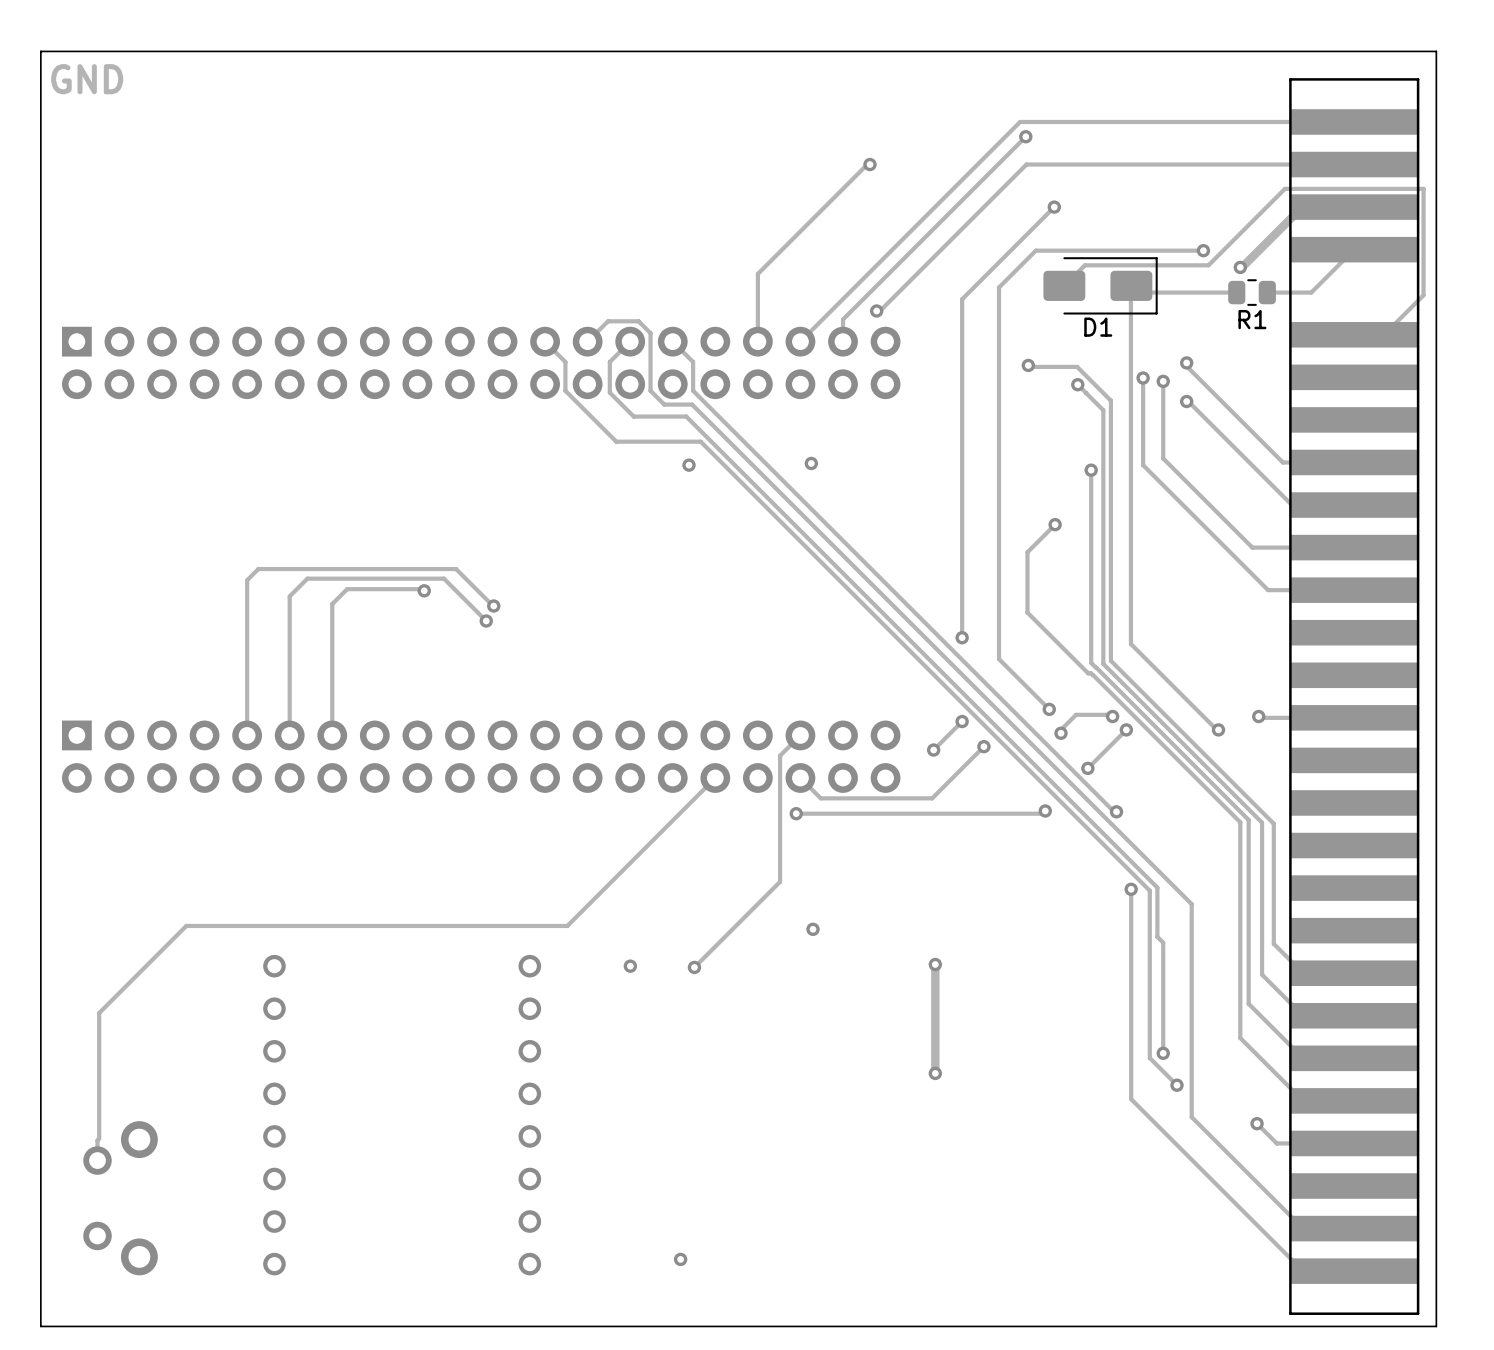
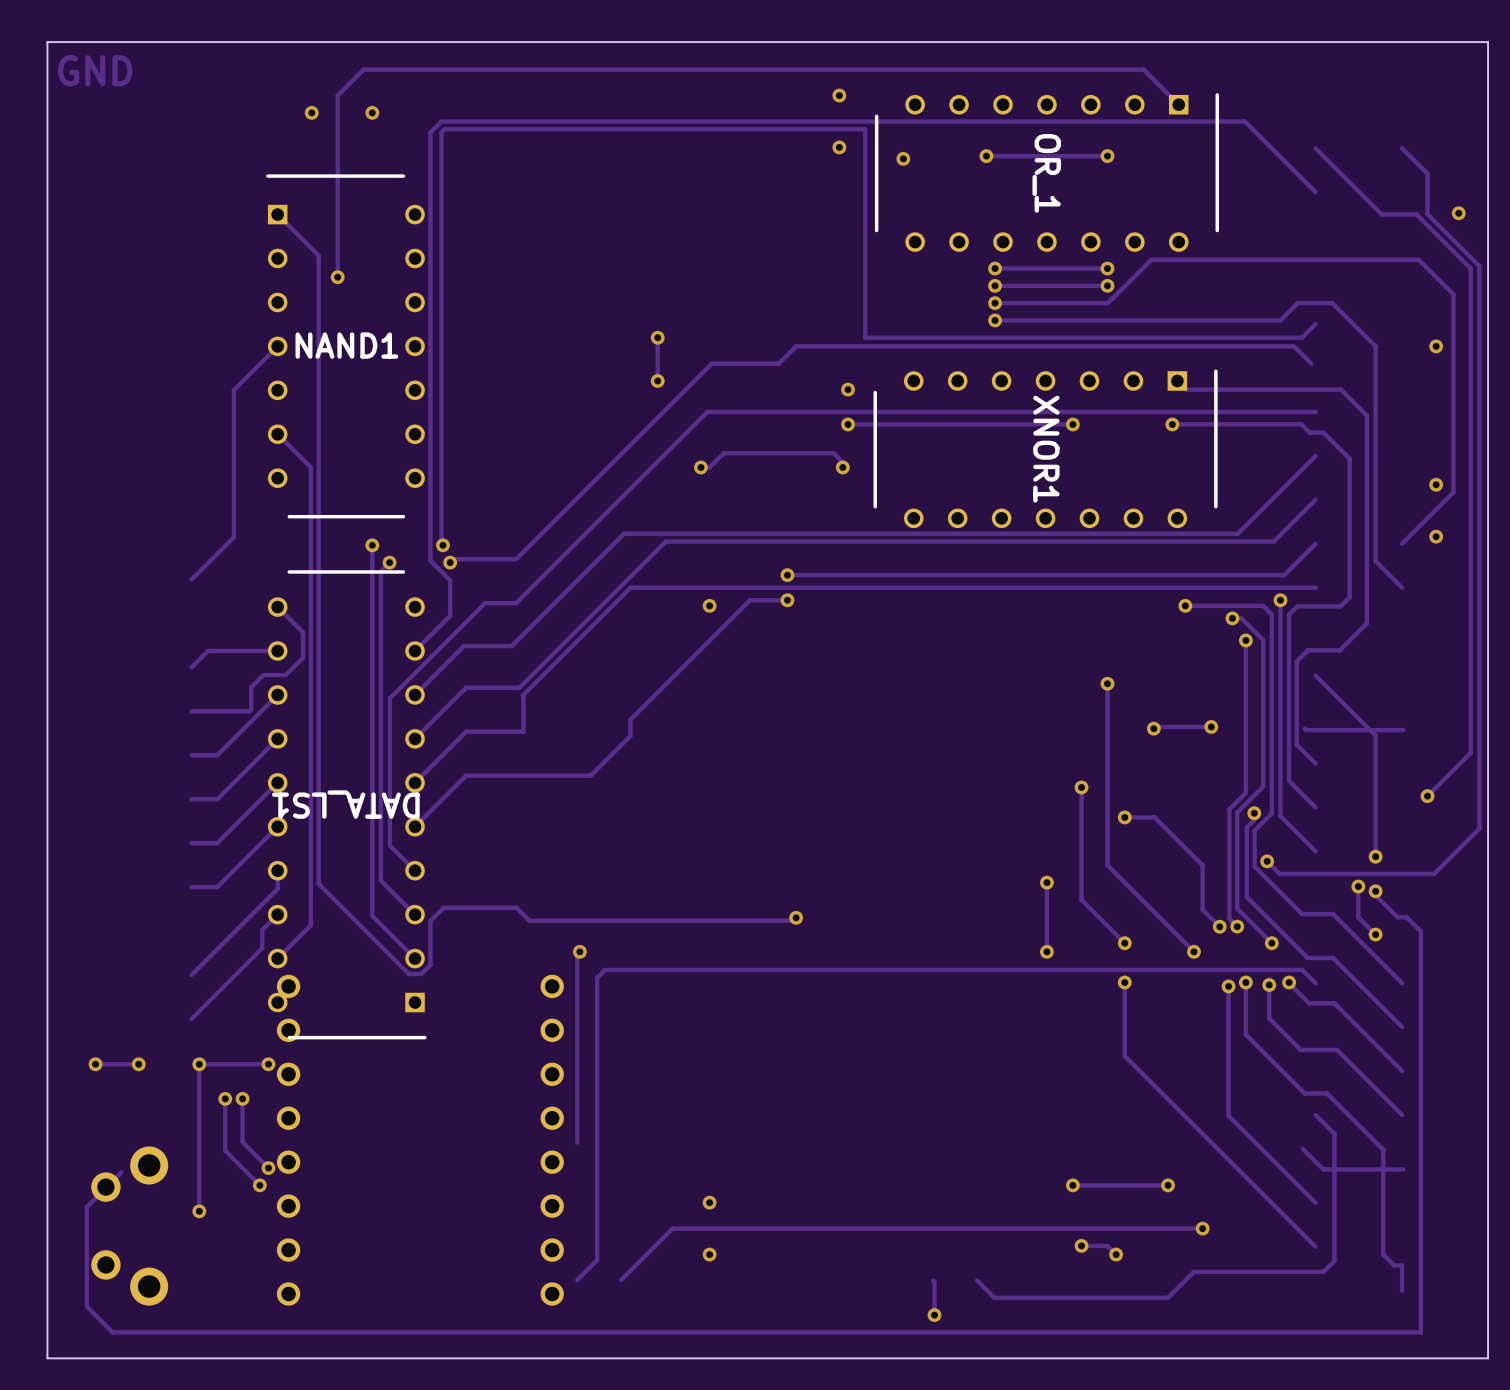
via: none -> (839, 95)
track: none -> (1178, 104) (1143, 69) (363, 69) (337, 95) (337, 277)
via: none -> (311, 112)
via: none -> (372, 112)
track: (1354, 121) (1020, 121) (800, 341) -> none
track: (1025, 136) (843, 319) (843, 341) -> none
via: (1025, 136) -> none
via: none -> (839, 147)
track: none -> (1315, 148) (1381, 214) (1416, 214) (1470, 268) (1470, 752) (1427, 796)
track: none -> (1402, 148) (1427, 173) (1427, 214) (1479, 266) (1479, 828) (1434, 873) (1279, 873) (1267, 861)
via: none -> (986, 156)
track: none -> (1107, 156) (986, 156)
via: none -> (1107, 156)
track: (869, 164) (867, 164) (757, 273) (757, 341) -> none
track: (1354, 164) (1026, 164) (880, 310) (876, 310) -> none
OR_1: none -> (1046, 172)
track: none -> (1315, 192) (1244, 121) (441, 121) (430, 132) (430, 560) (450, 580) (450, 615) (415, 651)
track: (1054, 207) (962, 299) (962, 637) -> none
via: (1054, 207) -> none
track: (1302, 207) (1240, 267) -> none
via: none -> (1458, 213)
track: none -> (277, 214) (318, 255) (318, 884) (408, 973) (421, 973) (430, 964) (430, 921) (443, 907) (516, 907) (529, 920) (793, 920) (796, 917)
track: (1354, 249) (1311, 292) (1267, 292) -> none
track: (1203, 250) (1035, 250) (999, 287) (999, 659) (1049, 709) -> none
via: (1203, 250) -> none
via: (1240, 267) -> none
via: none -> (995, 268)
track: none -> (1107, 268) (995, 268)
via: none -> (1107, 268)
via: none -> (337, 277)
track: (1064, 285) (1084, 265) (1208, 265) (1284, 188) (1423, 188) (1423, 295) (1384, 334) (1354, 334) -> none
D1: (1100, 285) -> none
track: (1131, 285) (1130, 644) (1218, 729) -> none
via: none -> (995, 285)
track: none -> (1107, 285) (995, 285)
via: none -> (1107, 285)
track: (1236, 292) (1143, 292) -> none
R1: (1252, 292) -> none
track: none -> (995, 303) (1107, 303) (1151, 259) (1418, 259) (1453, 294) (1453, 492) (1402, 543)
via: none -> (995, 303)
via: (876, 310) -> none
track: none -> (995, 320) (1280, 320) (1297, 303) (1332, 303) (1375, 346) (1375, 561) (1402, 587)
via: none -> (995, 320)
track: none -> (1315, 324) (1301, 337) (865, 337) (864, 129) (444, 129) (441, 132) (442, 545)
track: none -> (657, 337) (657, 380)
via: none -> (657, 337)
track: (545, 341) (565, 362) (565, 390) (616, 441) (700, 441) (1149, 890) (1149, 1058) (1176, 1085) -> none
track: (587, 341) (607, 321) (638, 321) (650, 333) (650, 390) (664, 404) (692, 404) (1191, 904) (1191, 1117) (1303, 1228) (1354, 1228) -> none
track: (630, 341) (609, 362) (609, 392) (633, 416) (686, 416) (1157, 887) (1157, 936) (1163, 942) (1163, 1053) -> none
track: (672, 341) (693, 362) (693, 390) (1114, 811) (1116, 811) -> none
track: none -> (277, 346) (233, 390) (233, 537) (191, 579)
NAND1: none -> (345, 346)
via: none -> (1436, 346)
part: (481, 362) -> none
track: (1186, 362) (1186, 366) (1282, 462) (1354, 462) -> none
via: (1186, 362) -> none
track: none -> (1311, 363) (1293, 346) (796, 346) (778, 363) (711, 363) (516, 559) (453, 559) (450, 562)
track: (1028, 365) (1077, 366) (1110, 400) (1110, 660) (1273, 823) (1273, 943) (1303, 973) (1354, 973) -> none
via: (1028, 365) -> none
track: (1143, 378) (1143, 465) (1268, 590) (1354, 590) -> none
via: (1143, 378) -> none
via: none -> (657, 380)
track: none -> (1177, 380) (1186, 389) (1341, 389) (1366, 415) (1366, 623) (1339, 650) (1307, 650) (1296, 661) (1296, 744) (1315, 763)
track: (1163, 381) (1163, 458) (1252, 547) (1354, 547) -> none
via: (1163, 381) -> none
track: (1077, 384) (1103, 410) (1103, 663) (1262, 822) (1262, 974) (1303, 1015) (1354, 1015) -> none
via: (1077, 384) -> none
via: none -> (848, 389)
track: (1186, 401) (1291, 505) (1354, 505) -> none
via: (1186, 401) -> none
track: none -> (1315, 411) (707, 411) (516, 603) (485, 603) (389, 698) (389, 845) (415, 870)
via: none -> (848, 424)
track: none -> (1072, 424) (848, 424)
via: none -> (1072, 424)
track: none -> (1172, 424) (1301, 424) (1309, 432) (1323, 432) (1349, 458) (1349, 597) (1340, 606) (1297, 606) (1289, 614) (1289, 780) (1315, 807)
via: none -> (1172, 424)
track: none -> (277, 434) (310, 467) (310, 925) (277, 958)
XNOR1: none -> (1045, 448)
track: none -> (1315, 455) (1237, 533) (624, 533) (511, 646) (463, 646) (415, 694)
track: none -> (848, 467) (833, 453) (723, 453) (709, 467) (700, 467)
via position: (689, 465) -> (700, 467)
track: (1091, 470) (1091, 662) (1248, 819) (1248, 1003) (1303, 1058) (1354, 1058) -> none
via: (1091, 470) -> none
via: none -> (1436, 484)
track: none -> (1315, 499) (1273, 541) (665, 541) (519, 687) (466, 687) (415, 738)
track: (1055, 524) (1027, 552) (1027, 612) (1088, 673) (1093, 675) (1240, 822) (1240, 1038) (1303, 1100) (1354, 1100) -> none
via: (1055, 524) -> none
via: none -> (1436, 536)
track: none -> (1315, 543) (1284, 575) (787, 575)
track: none -> (372, 545) (372, 915) (415, 958)
via: none -> (372, 545)
via: none -> (442, 545)
track: none -> (389, 562) (380, 571) (380, 880) (415, 914)
via: none -> (389, 562)
via: none -> (450, 562)
via: none -> (787, 575)
track: none -> (1315, 587) (630, 587) (522, 695) (523, 731) (466, 731) (415, 782)
track: (424, 590) (422, 589) (347, 589) (332, 604) (332, 735) -> none
via: (424, 590) -> none
track: none -> (787, 600) (749, 600) (630, 719) (630, 735) (590, 775) (466, 775) (415, 826)
via: none -> (787, 600)
track: none -> (1280, 600) (1280, 816) (1315, 851)
via: none -> (1280, 600)
via: none -> (709, 605)
track: none -> (1185, 605) (1263, 605) (1271, 614) (1271, 813) (1254, 830) (1254, 866) (1302, 914) (1333, 914) (1402, 983)
via: none -> (1185, 605)
track: none -> (277, 607) (303, 632) (303, 657) (285, 675) (263, 675) (251, 687) (251, 709) (249, 711) (191, 711)
track: (493, 606) (456, 569) (258, 569) (247, 580) (247, 735) -> none
via: (493, 606) -> none
track: none -> (1232, 618) (1241, 618) (1263, 640) (1263, 786) (1237, 812) (1237, 908) (1271, 943)
via: none -> (1232, 618)
track: (486, 620) (443, 578) (307, 578) (289, 596) (289, 735) -> none
via: (486, 620) -> none
track: none -> (1245, 640) (1245, 792) (1229, 809) (1229, 918) (1237, 926)
via: none -> (1245, 640)
via: (962, 637) -> none
track: none -> (277, 651) (207, 651) (191, 667)
track: none -> (1315, 675) (1375, 735) (1375, 856)
track: none -> (1107, 683) (1107, 865) (1193, 951)
via: none -> (1107, 683)
track: none -> (277, 694) (217, 755) (191, 755)
part: (1354, 696) -> none
via: (1049, 709) -> none
track: none -> (1211, 726) (1150, 726)
via: none -> (1211, 726)
track: (1112, 716) (1076, 714) (1061, 729) (1061, 733) -> none
via: (1258, 716) -> none
track: (962, 721) (933, 750) -> none
via: (962, 721) -> none
track: none -> (277, 738) (217, 799) (191, 799)
track: (1126, 729) (1086, 770) -> none
via: (1126, 729) -> none
via: (1218, 729) -> none
via: (1061, 733) -> none
track: (800, 735) (780, 755) (780, 881) (694, 967) -> none
track: (983, 746) (932, 798) (820, 798) (800, 778) -> none
via: (983, 746) -> none
via: (933, 750) -> none
part: (481, 756) -> none
track: none -> (277, 782) (217, 843) (191, 843)
via: (1087, 768) -> none
track: none -> (1081, 787) (1081, 899) (1124, 943)
via: none -> (1081, 787)
track: (715, 778) (567, 925) (186, 925) (99, 1013) (97, 1160) -> none
via: none -> (1427, 796)
DATA_LS1: none -> (347, 804)
track: none -> (1254, 813) (1254, 819) (1246, 827) (1246, 897) (1307, 958) (1333, 958) (1402, 1027)
via: none -> (1254, 813)
track: none -> (1124, 817) (1154, 817) (1202, 865) (1202, 909) (1219, 926)
via: none -> (1124, 817)
track: (1045, 810) (1042, 813) (796, 813) -> none
via: (1045, 810) -> none
track: none -> (277, 826) (217, 887) (191, 887)
via: (1116, 811) -> none
via: (796, 813) -> none
via: none -> (1375, 856)
via: none -> (1267, 861)
track: none -> (277, 870) (277, 888) (191, 975)
track: none -> (1046, 882) (1046, 951)
via: none -> (1046, 882)
track: none -> (1358, 886) (1358, 917) (1375, 934)
via: none -> (1358, 886)
track: none -> (1375, 891) (1375, 895) (1397, 917) (1406, 917) (1420, 931) (1420, 1332) (112, 1332) (86, 1306) (86, 1206) (121, 1172)
via: none -> (1375, 891)
track: (1131, 889) (1131, 1099) (1303, 1271) (1354, 1271) -> none
via: (1131, 889) -> none
track: none -> (277, 914) (262, 930) (262, 948) (191, 1018)
via: none -> (796, 917)
via: none -> (1219, 926)
via: none -> (1237, 926)
via: none -> (1375, 934)
via: none -> (1124, 943)
via: none -> (1271, 943)
via: (813, 929) -> none
track: none -> (577, 951) (577, 1142)
via: none -> (579, 951)
via: none -> (1046, 951)
via: none -> (1193, 951)
track: none -> (1124, 982) (1124, 1055) (1315, 1246)
via: none -> (1124, 982)
track: none -> (1245, 982) (1245, 1034) (1304, 1093) (1326, 1093) (1383, 1150) (1383, 1254) (1394, 1265) (1402, 1265) (1402, 1290)
via: none -> (1245, 982)
track: none -> (1289, 982) (1309, 1003) (1334, 1003) (1402, 1071)
via: none -> (1289, 982)
track: none -> (1315, 983) (1302, 969) (605, 969) (597, 977) (597, 1260) (577, 1279)
track: (935, 964) (935, 1073) -> none
via: (935, 964) -> none
track: none -> (1269, 985) (1269, 1018) (1300, 1049) (1337, 1049) (1402, 1114)
via: none -> (1269, 985)
via: (630, 966) -> none
track: none -> (1228, 986) (1228, 1115) (1315, 1202)
via: none -> (1228, 986)
via: (694, 967) -> none
via: none -> (95, 1064)
track: none -> (138, 1064) (95, 1064)
via: none -> (138, 1064)
via: none -> (199, 1064)
track: none -> (268, 1064) (199, 1064) (199, 1211)
via: none -> (268, 1064)
via: (1163, 1053) -> none
via: (935, 1073) -> none
track: none -> (225, 1098) (225, 1150) (259, 1185)
via: none -> (225, 1098)
track: none -> (242, 1098) (242, 1142) (268, 1168)
via: none -> (242, 1098)
via: (1176, 1085) -> none
track: none -> (1315, 1114) (1334, 1133) (1334, 1260) (1323, 1271) (1193, 1271) (1168, 1297) (994, 1297) (977, 1280)
via: (1257, 1123) -> none
via: none -> (268, 1168)
via: none -> (259, 1185)
via: none -> (1072, 1185)
track: none -> (1168, 1185) (1072, 1185)
via: none -> (1168, 1185)
via: none -> (709, 1202)
via: none -> (199, 1211)
track: none -> (1202, 1228) (672, 1228) (621, 1279)
via: none -> (1202, 1228)
track: none -> (1081, 1245) (1107, 1245) (1116, 1254)
via: none -> (1081, 1245)
via: none -> (1116, 1254)
track: none -> (933, 1280) (934, 1315)
via position: (680, 1259) -> (709, 1254)
via: none -> (934, 1315)

